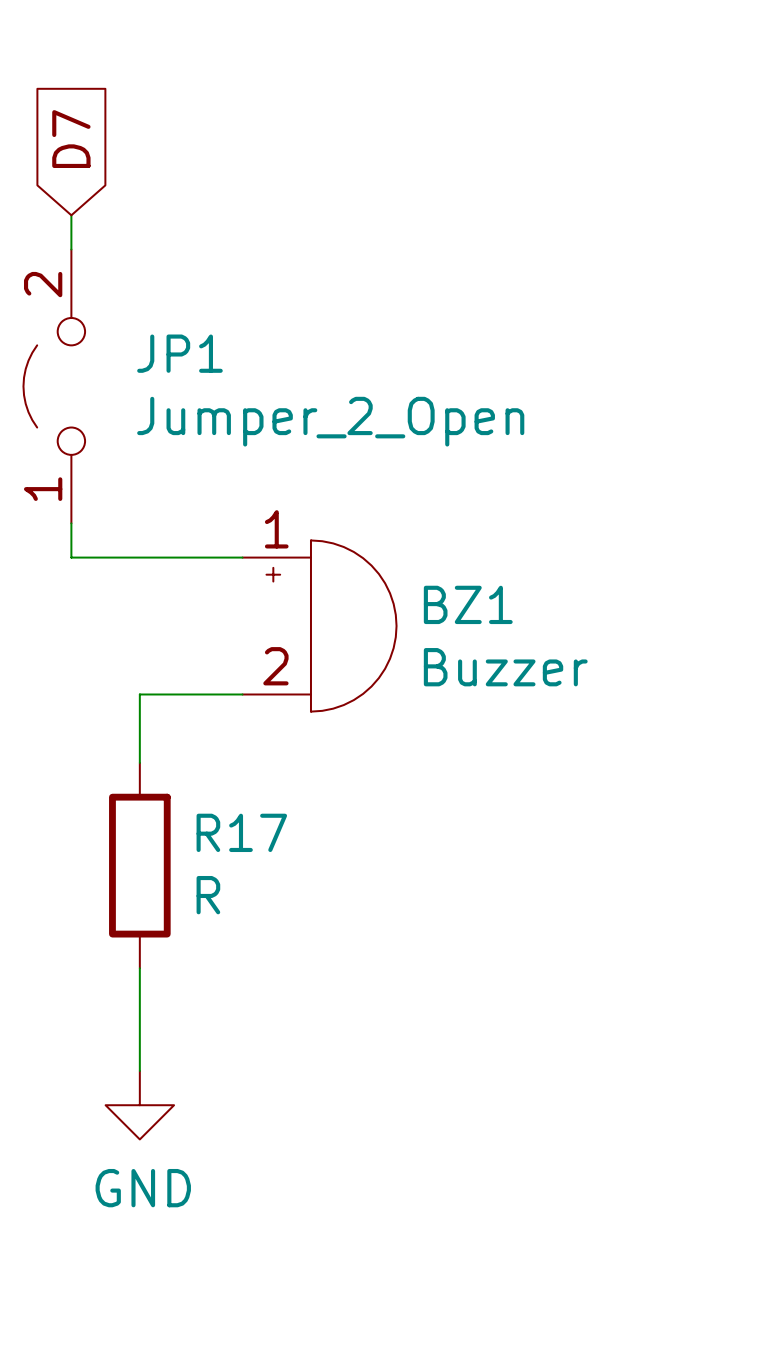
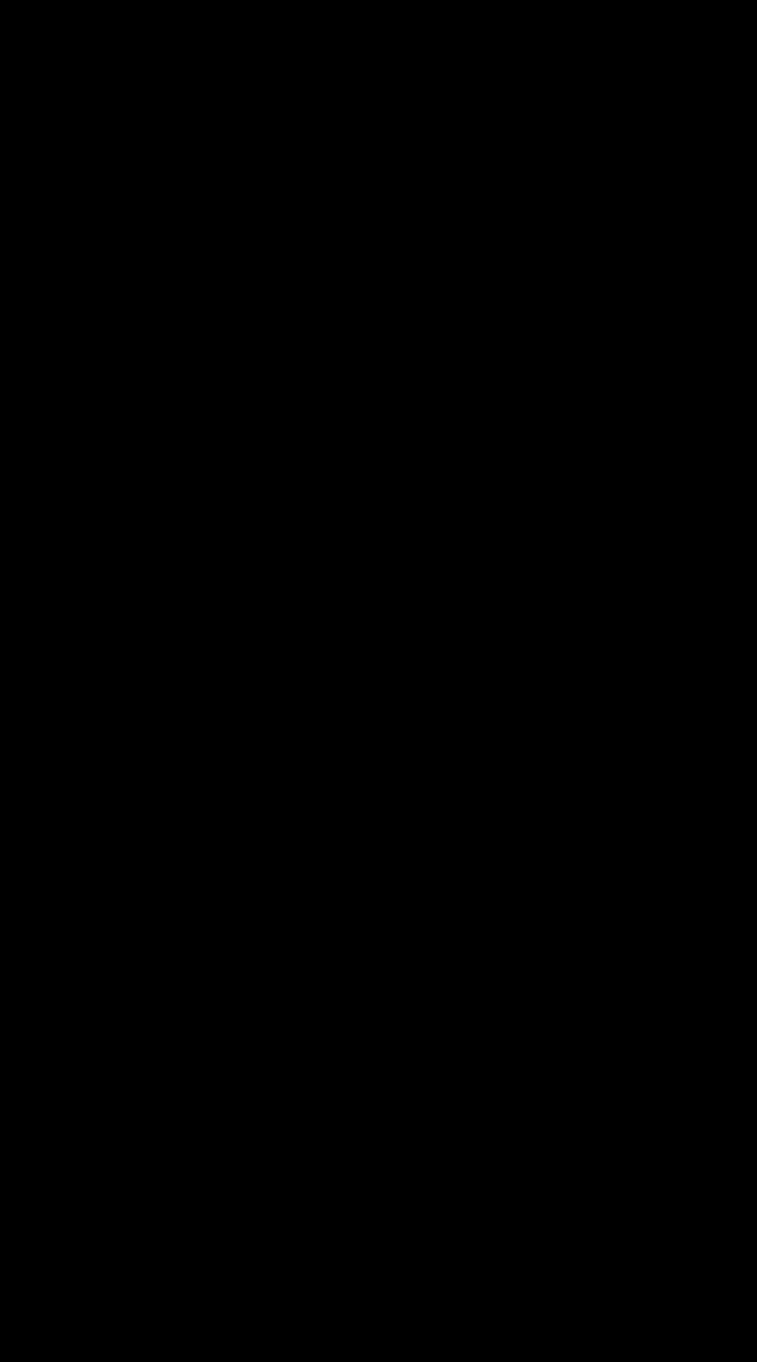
global label: D7 (71, 139) -> none
wire: (71, 215) (71, 249) -> none
JP1: Jumper_2_Open (54, 386) -> none
wire: (71, 523) (71, 557) (242, 557) -> none
BZ1: Buzzer (319, 626) -> none
wire: (242, 694) (139, 694) (139, 762) -> none
R17: R (139, 865) -> none
wire: (139, 968) (139, 1070) -> none
power symbol: GND (139, 1105) -> none

